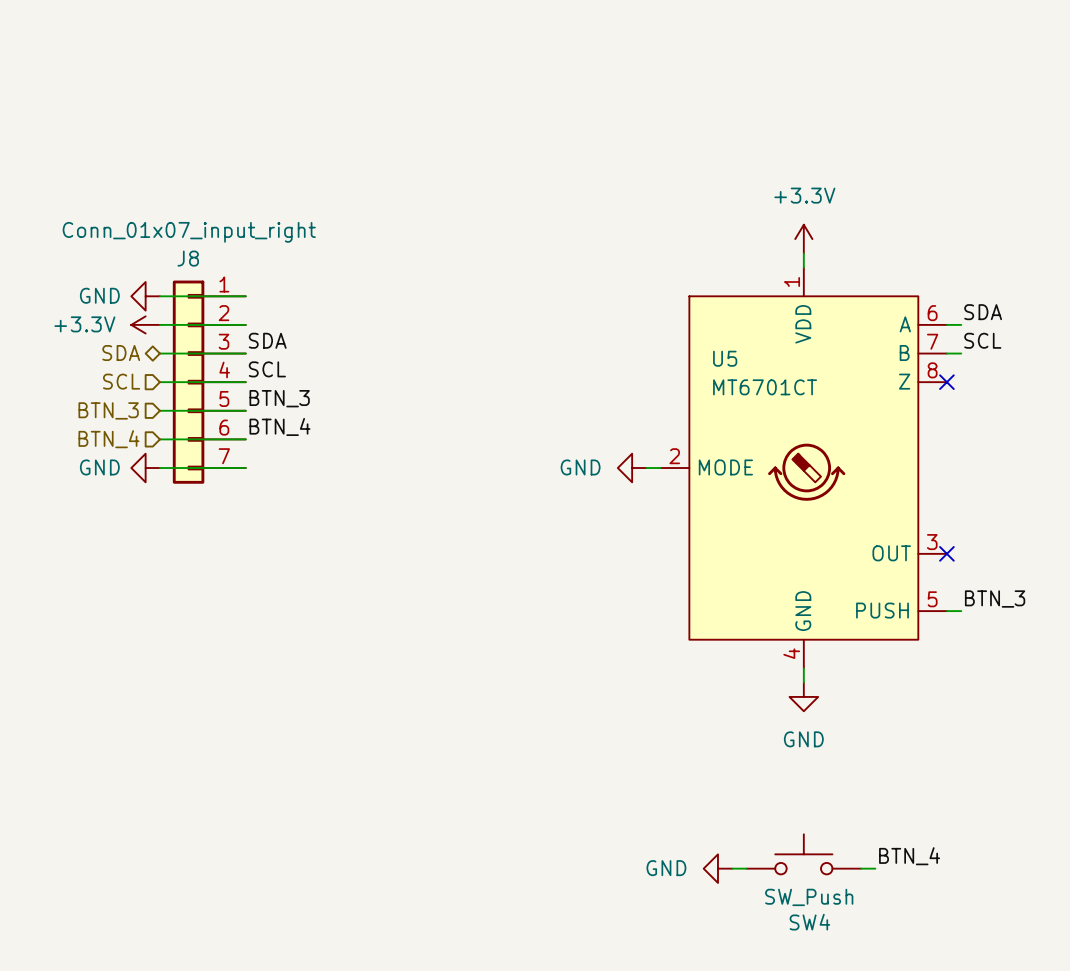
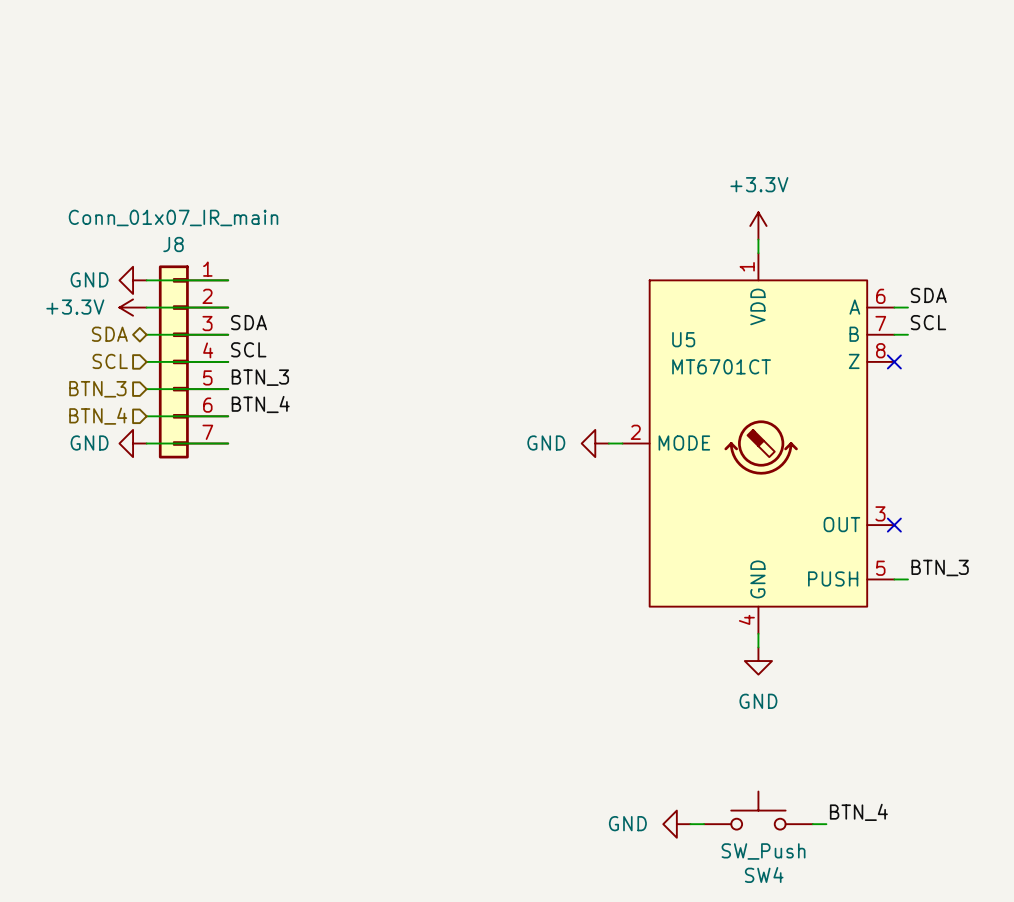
J8 value: Conn_01x07_input_right (189, 232) -> Conn_01x07_IR_main (173, 217)

